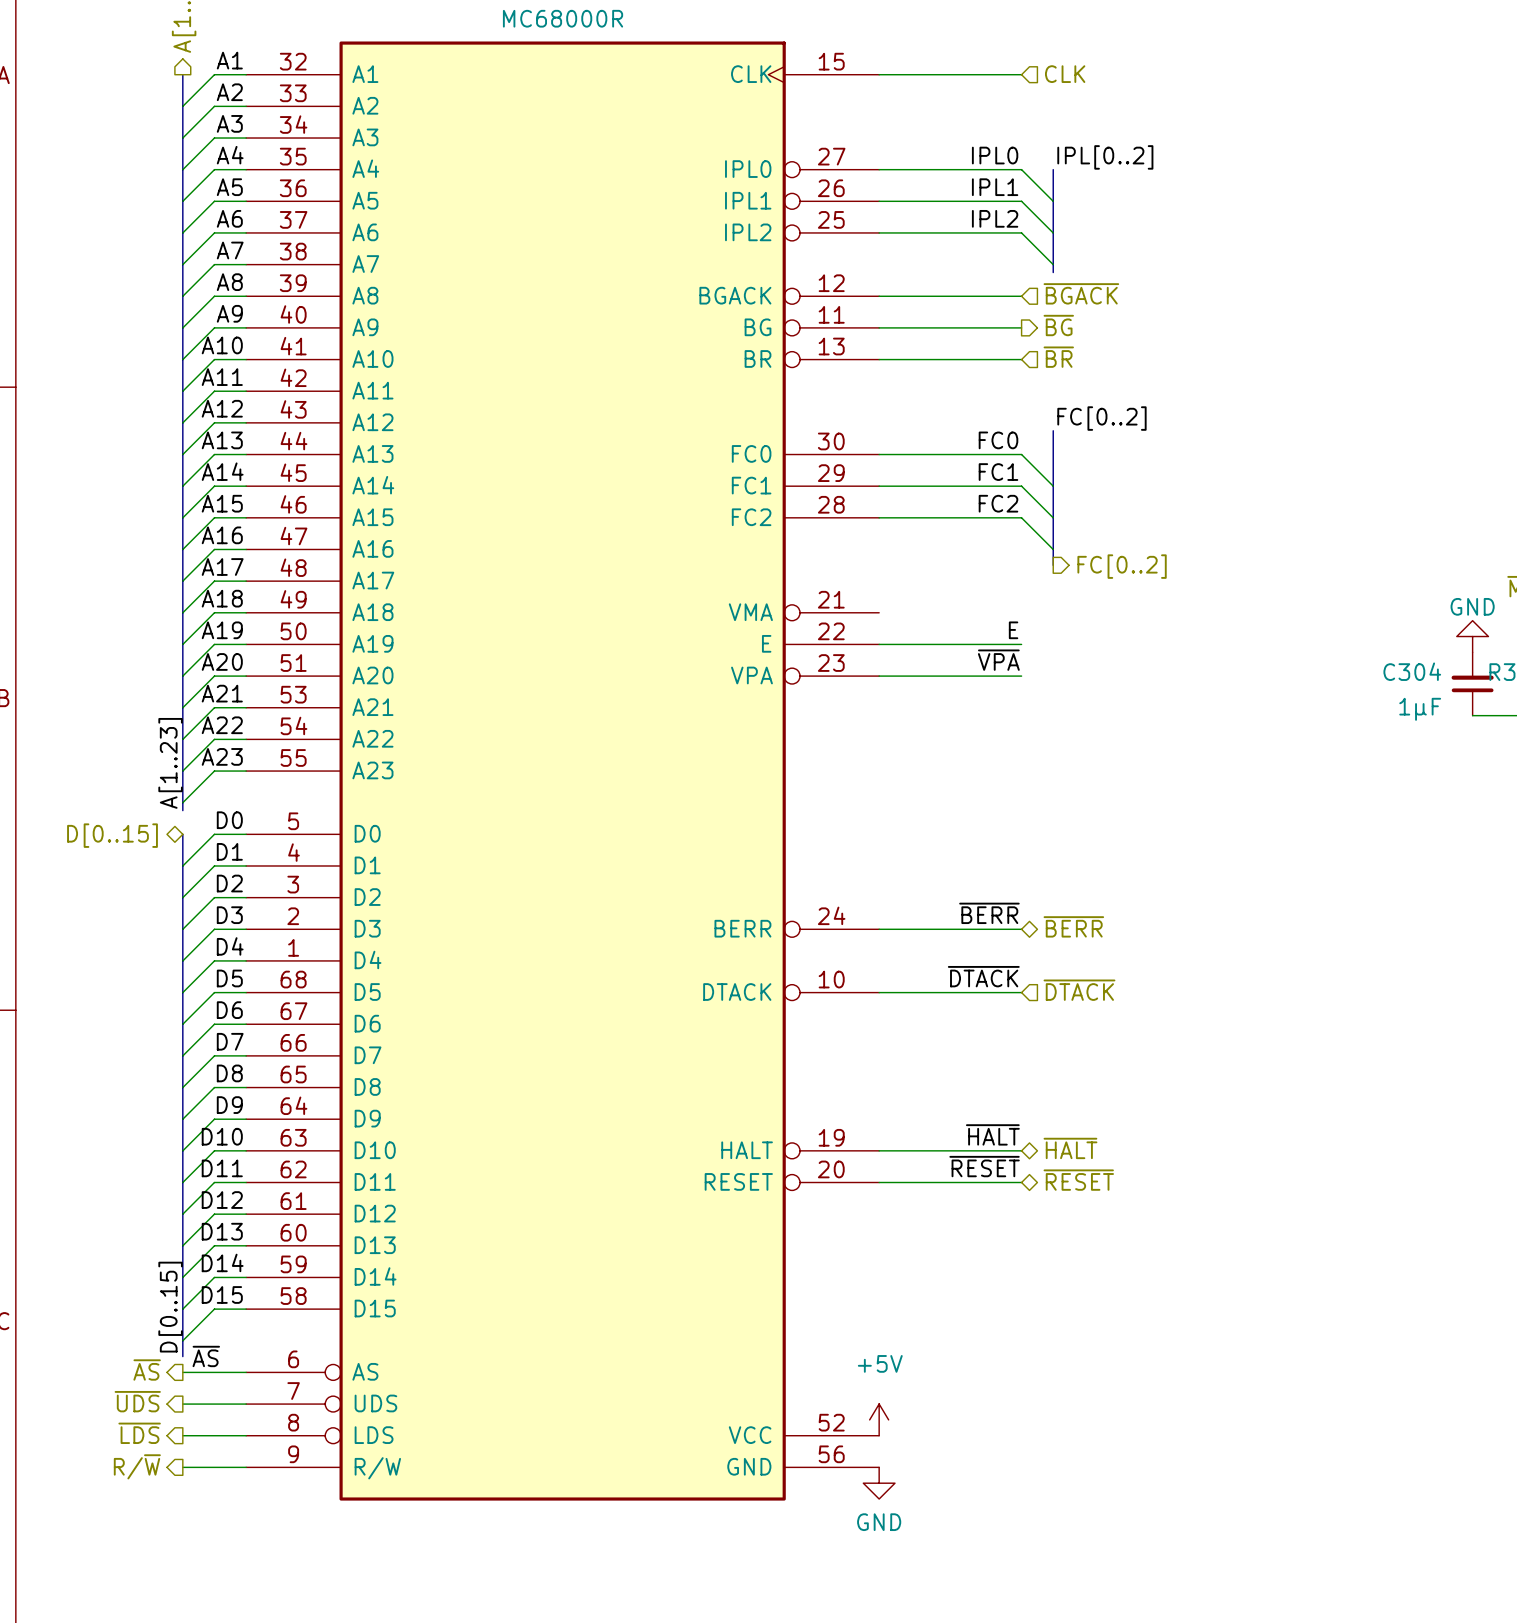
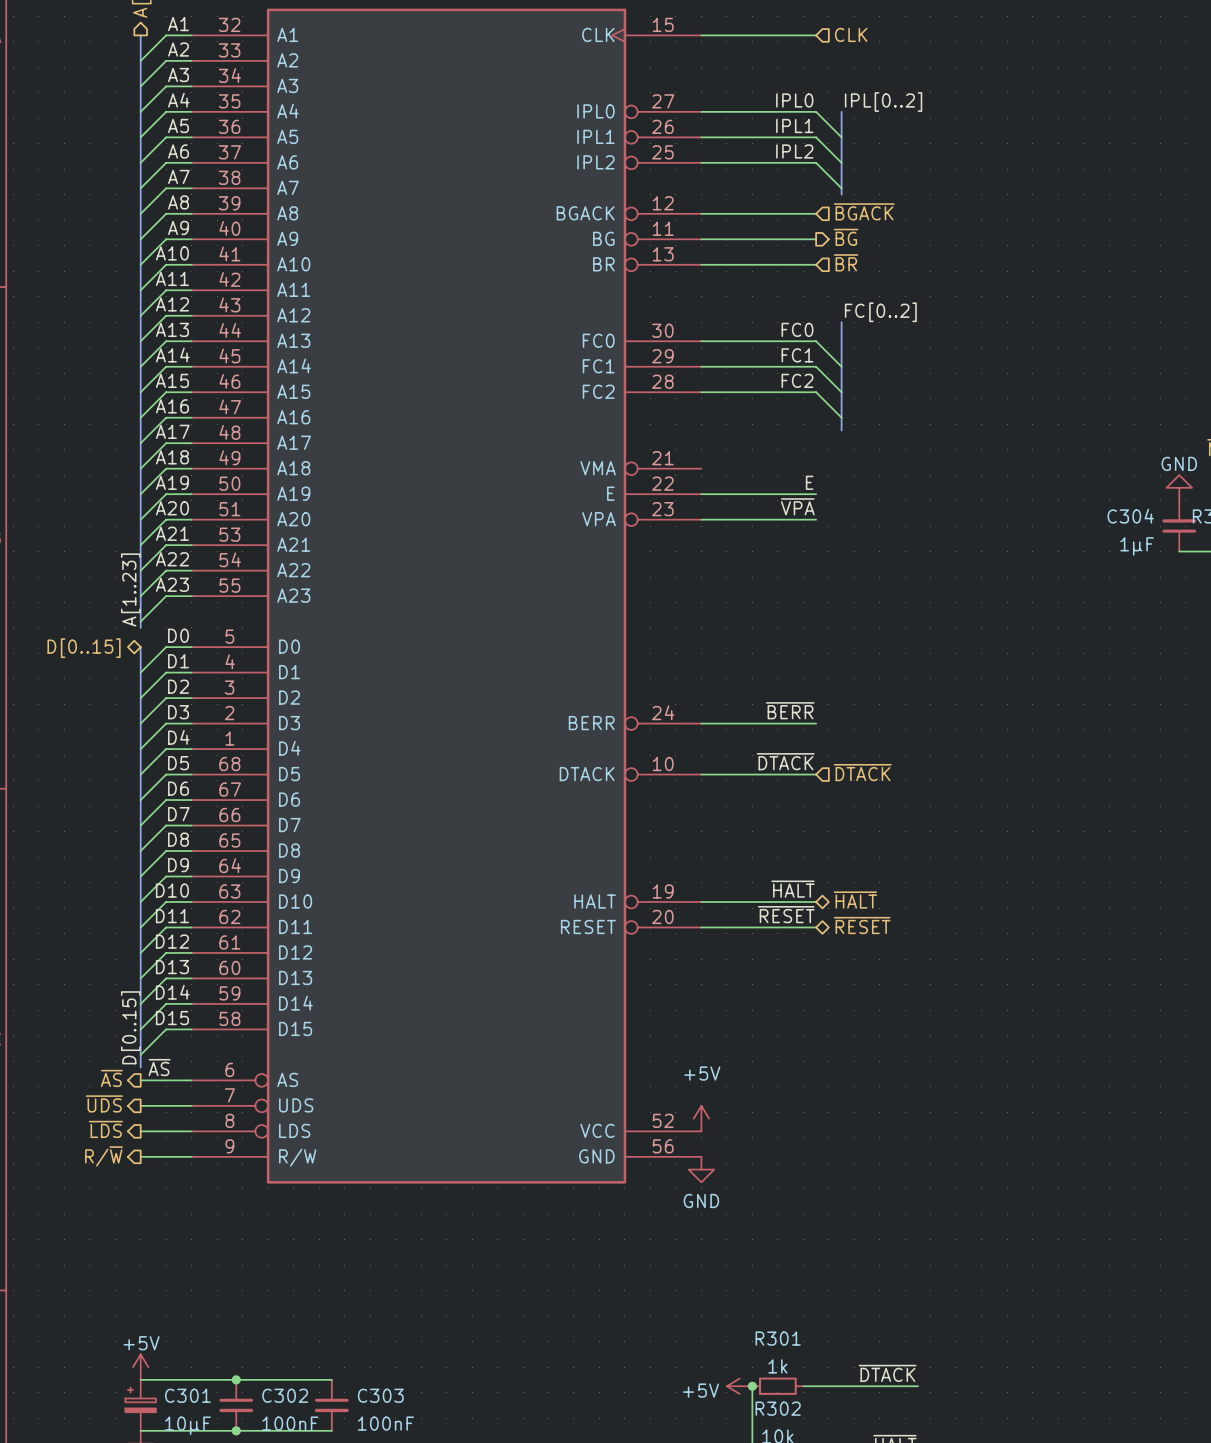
hierarchical label: FC[0..2] (1122, 566) -> none
hierarchical label: ~{BERR} (1073, 926) -> none

